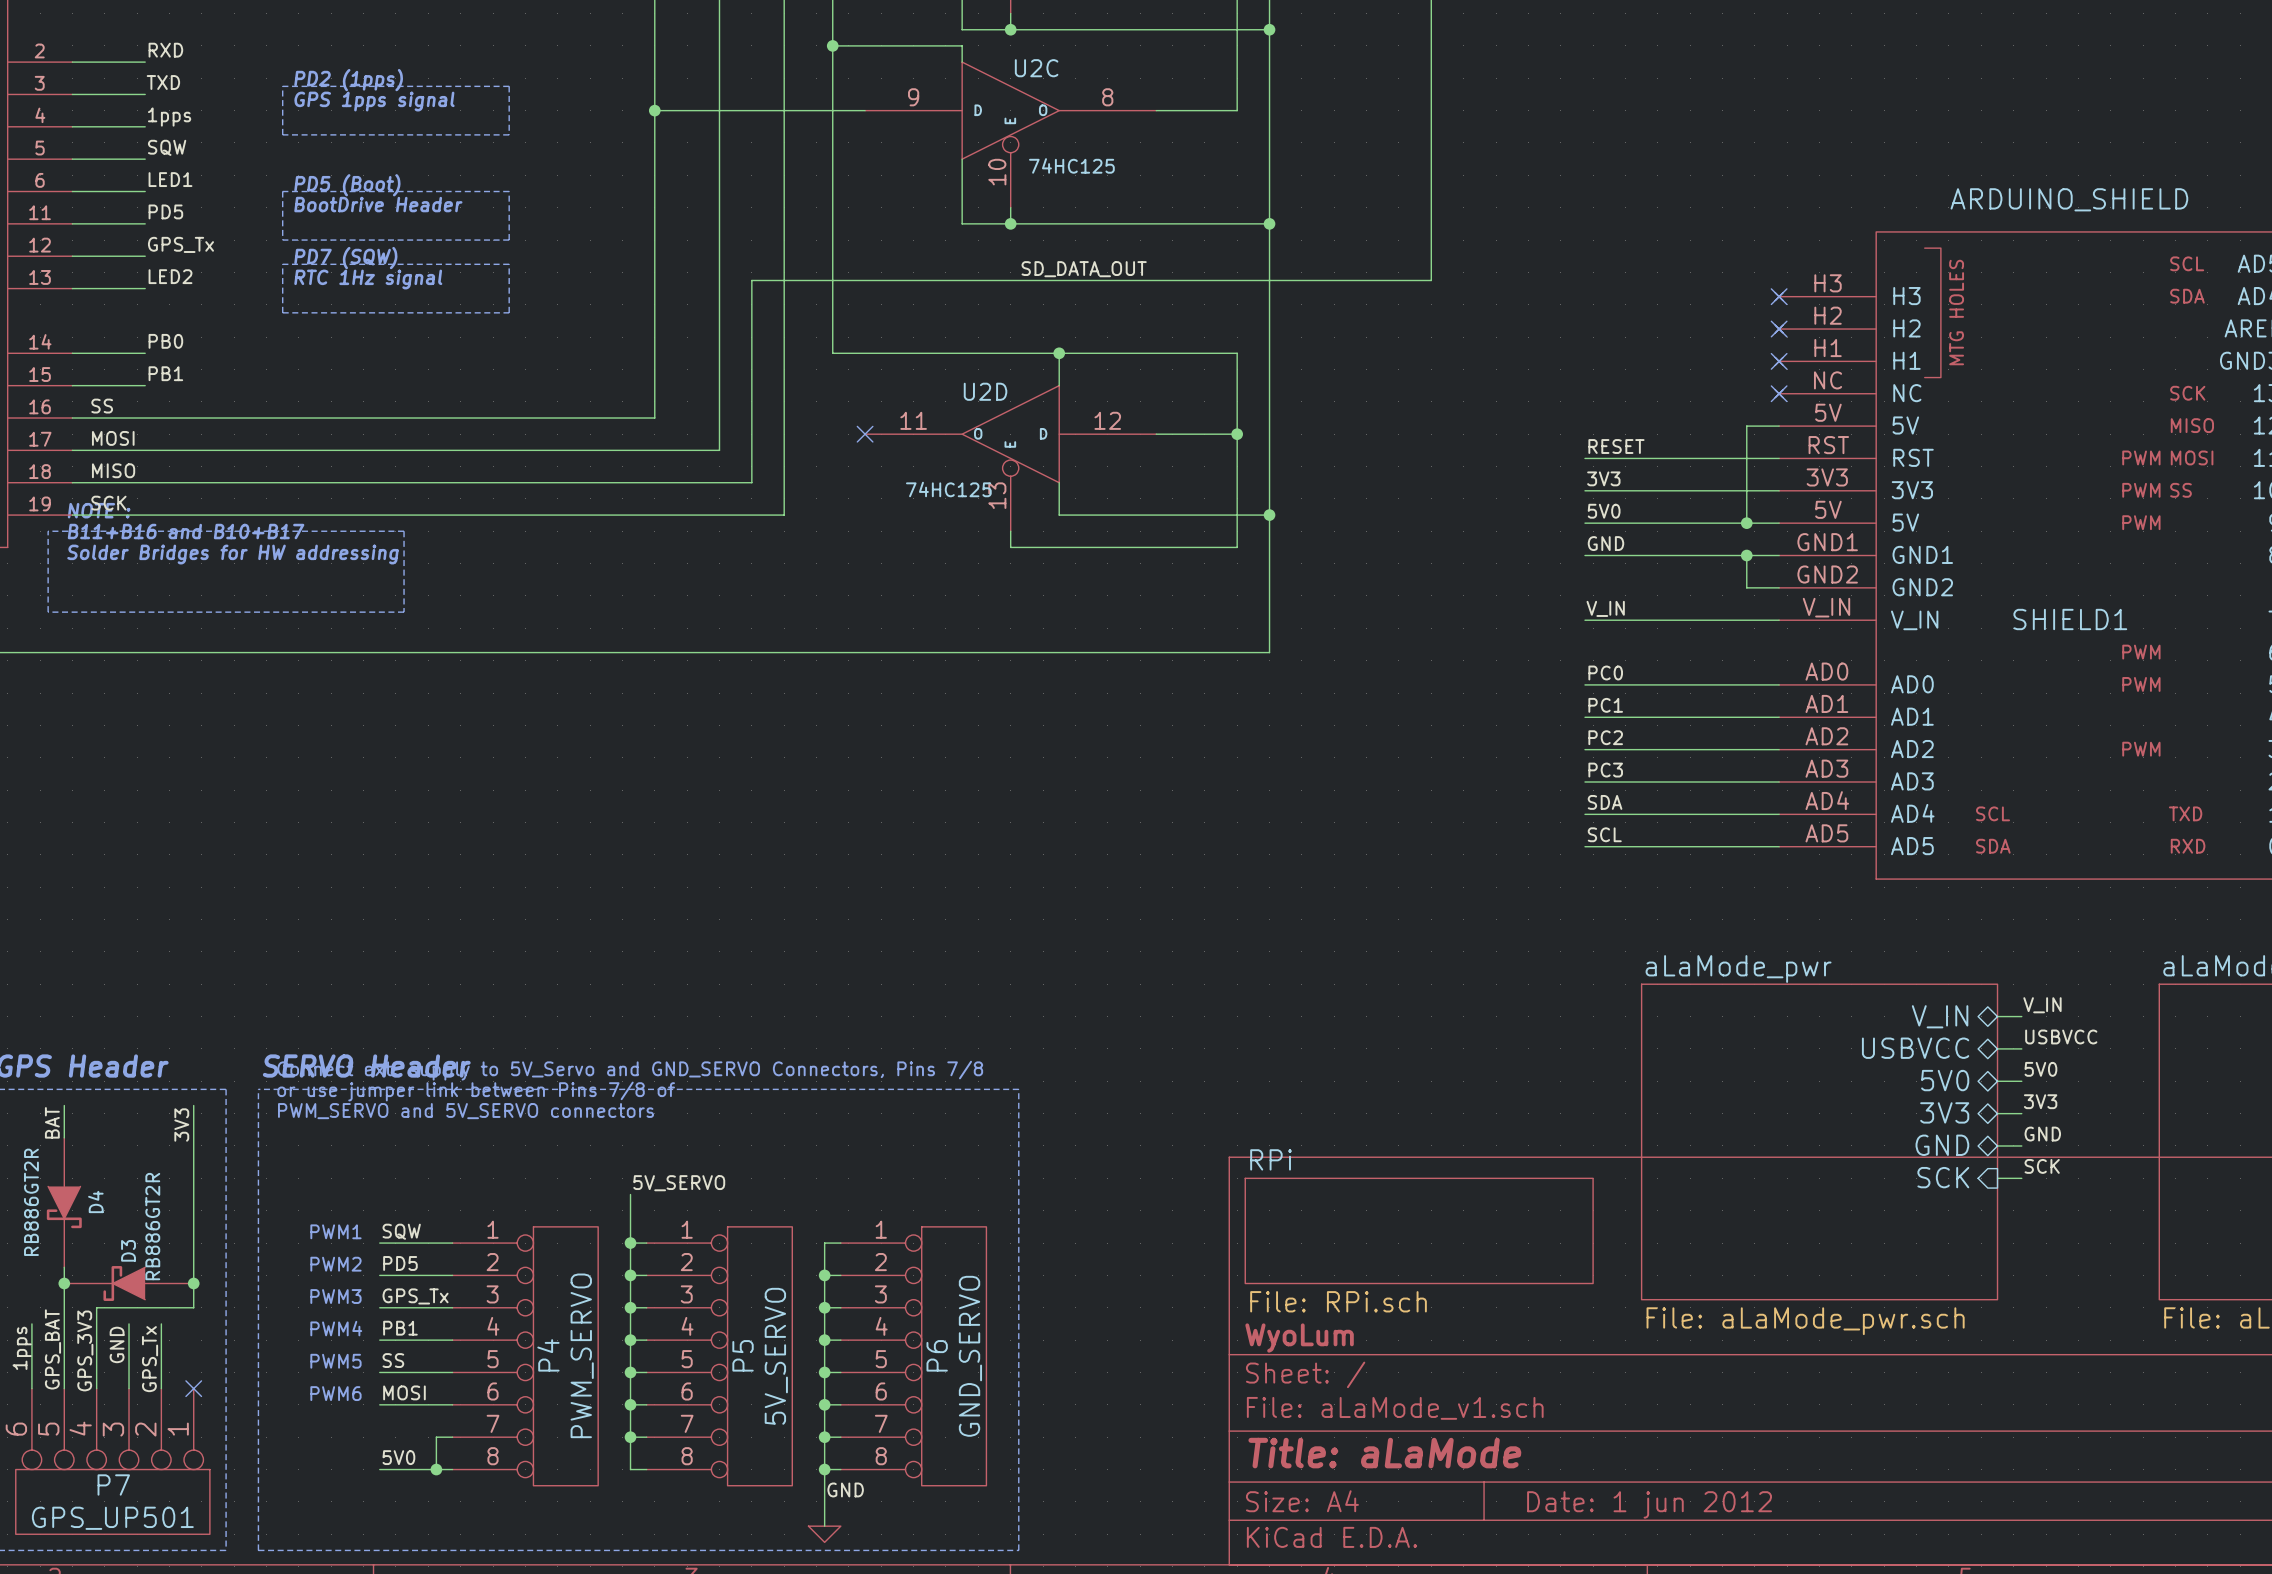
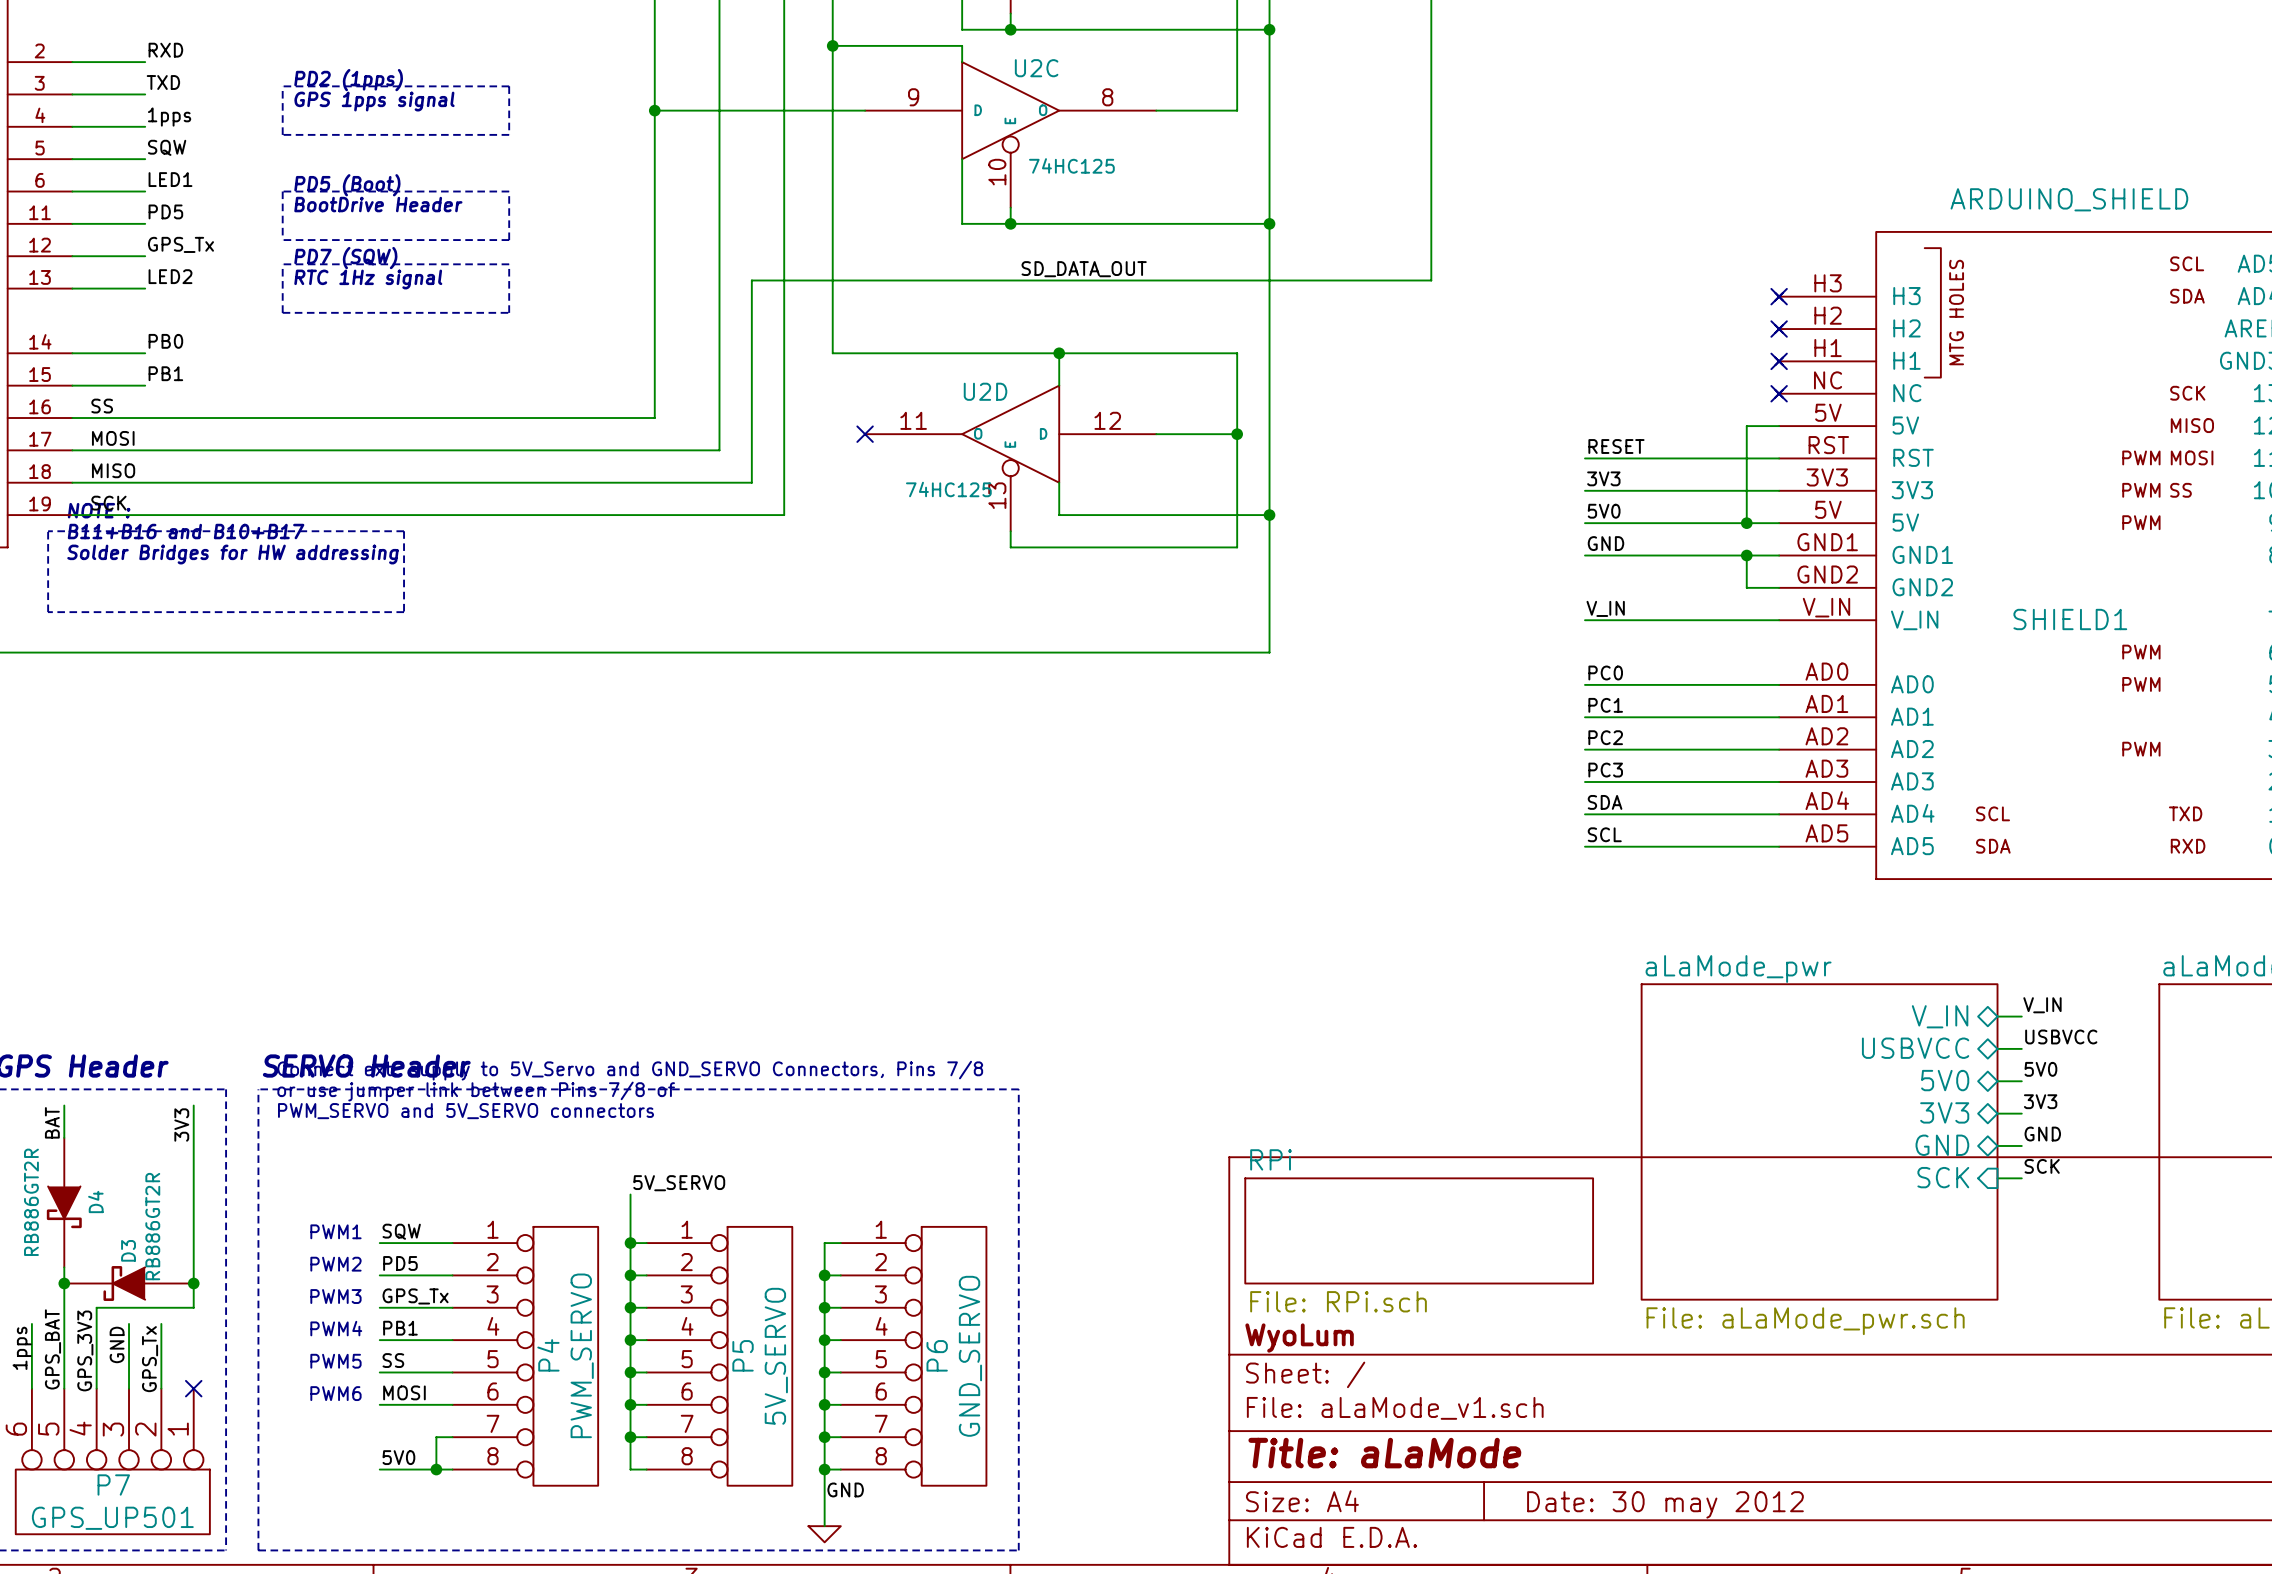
title block: Date: 1 jun 2012 (1649, 1504) -> Date: 30 may 2012 (1665, 1504)

